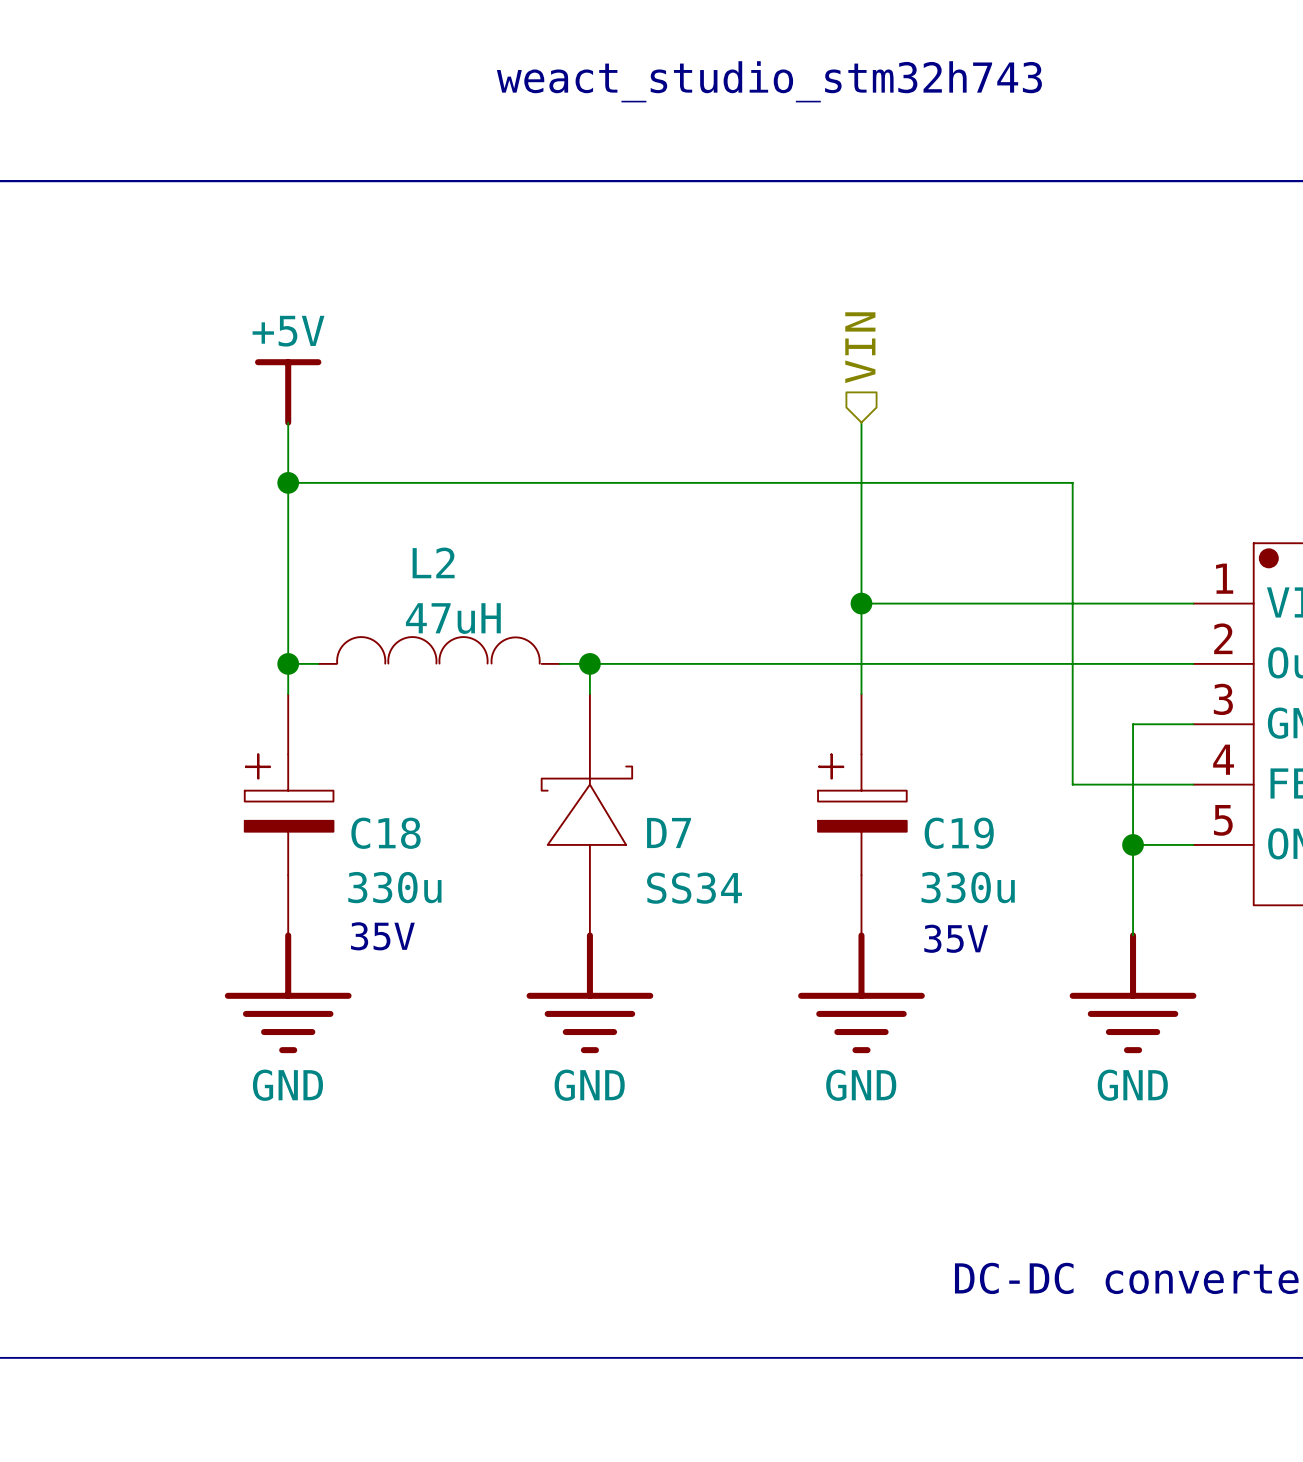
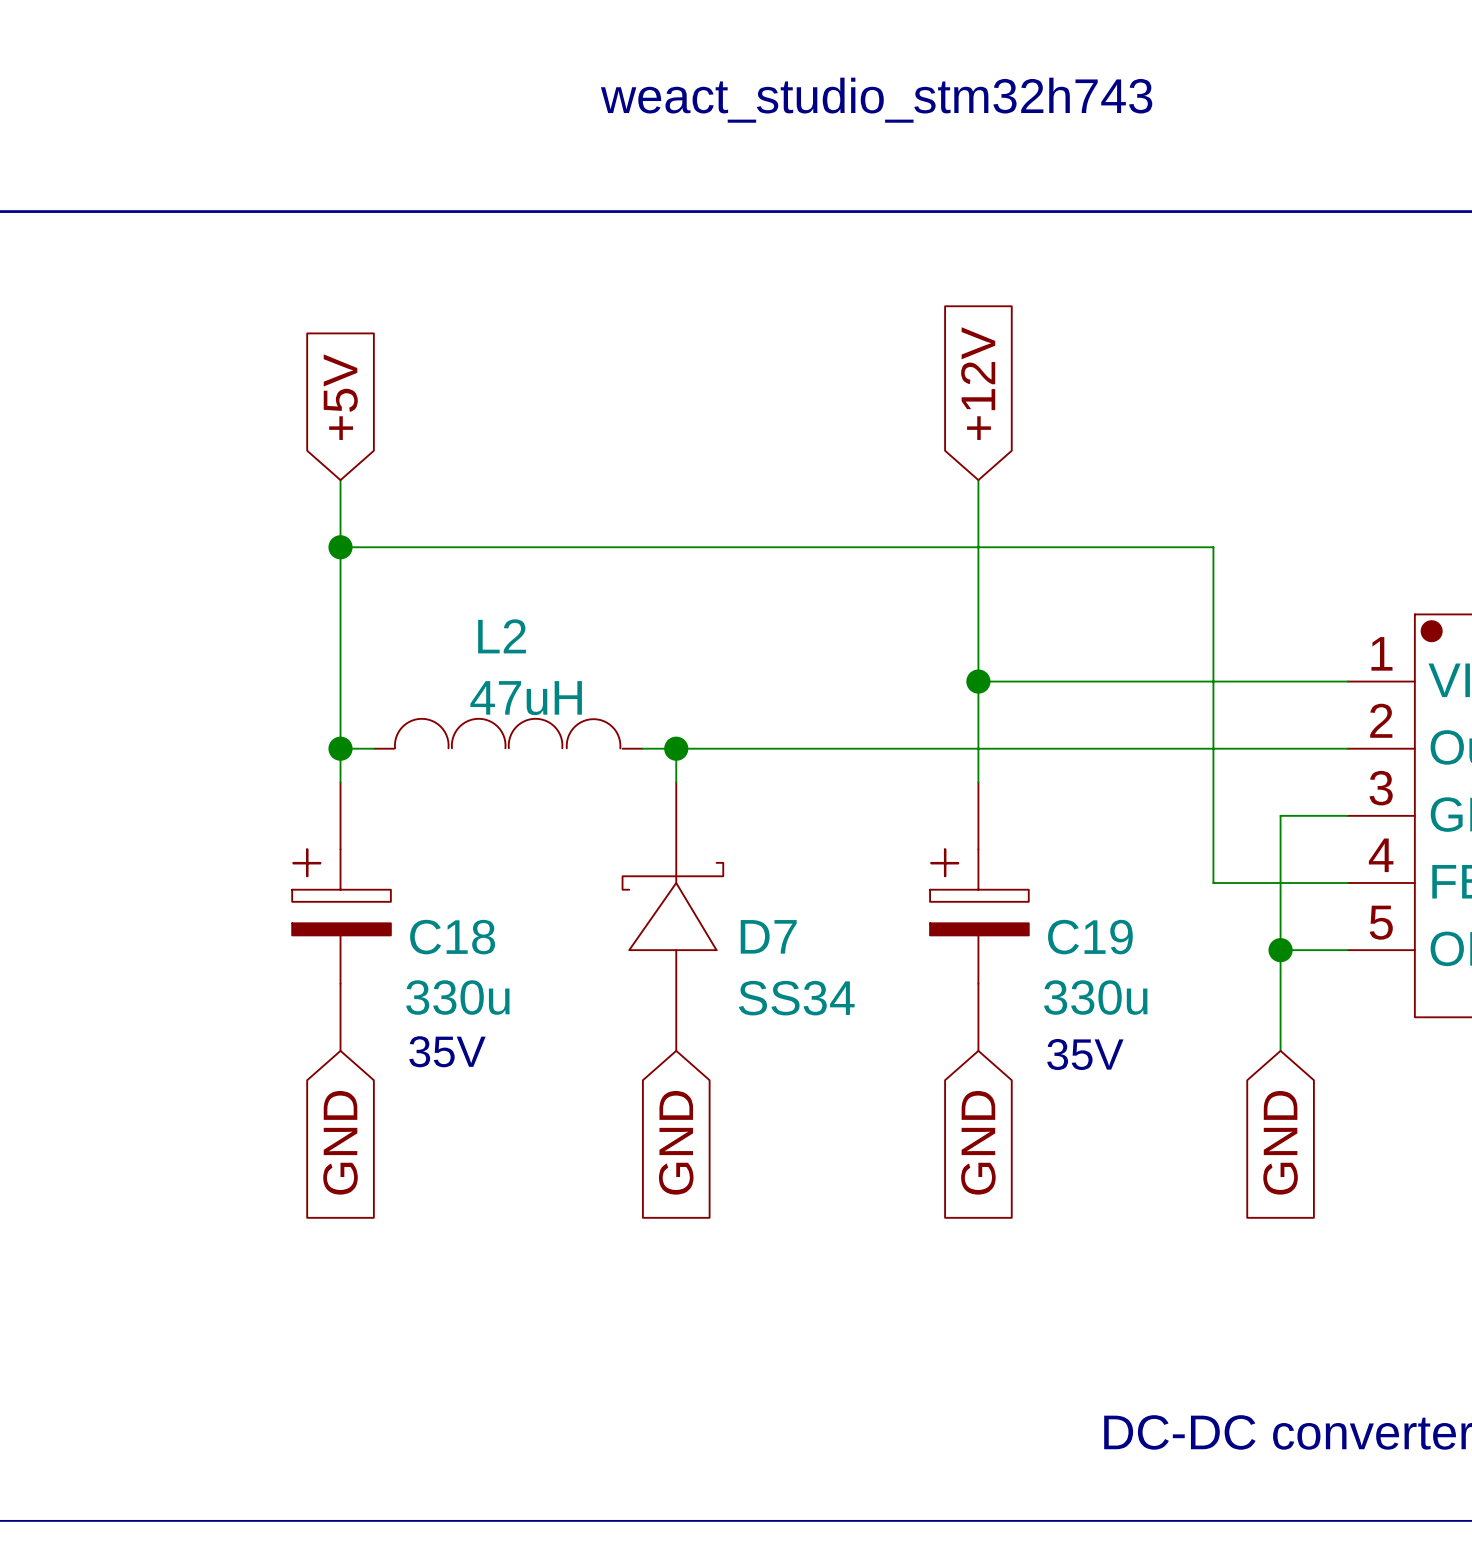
global label: none -> +12V (978, 383)
hierarchical label: VIN (860, 347) -> none
global label: none -> +5V (340, 397)
power symbol: +5V (288, 392) -> none
power symbol: GND (288, 992) -> none
power symbol: GND (589, 992) -> none
power symbol: GND (861, 992) -> none
power symbol: GND (1133, 992) -> none
global label: none -> GND (340, 1142)
global label: none -> GND (676, 1142)
global label: none -> GND (978, 1142)
global label: none -> GND (1280, 1142)

